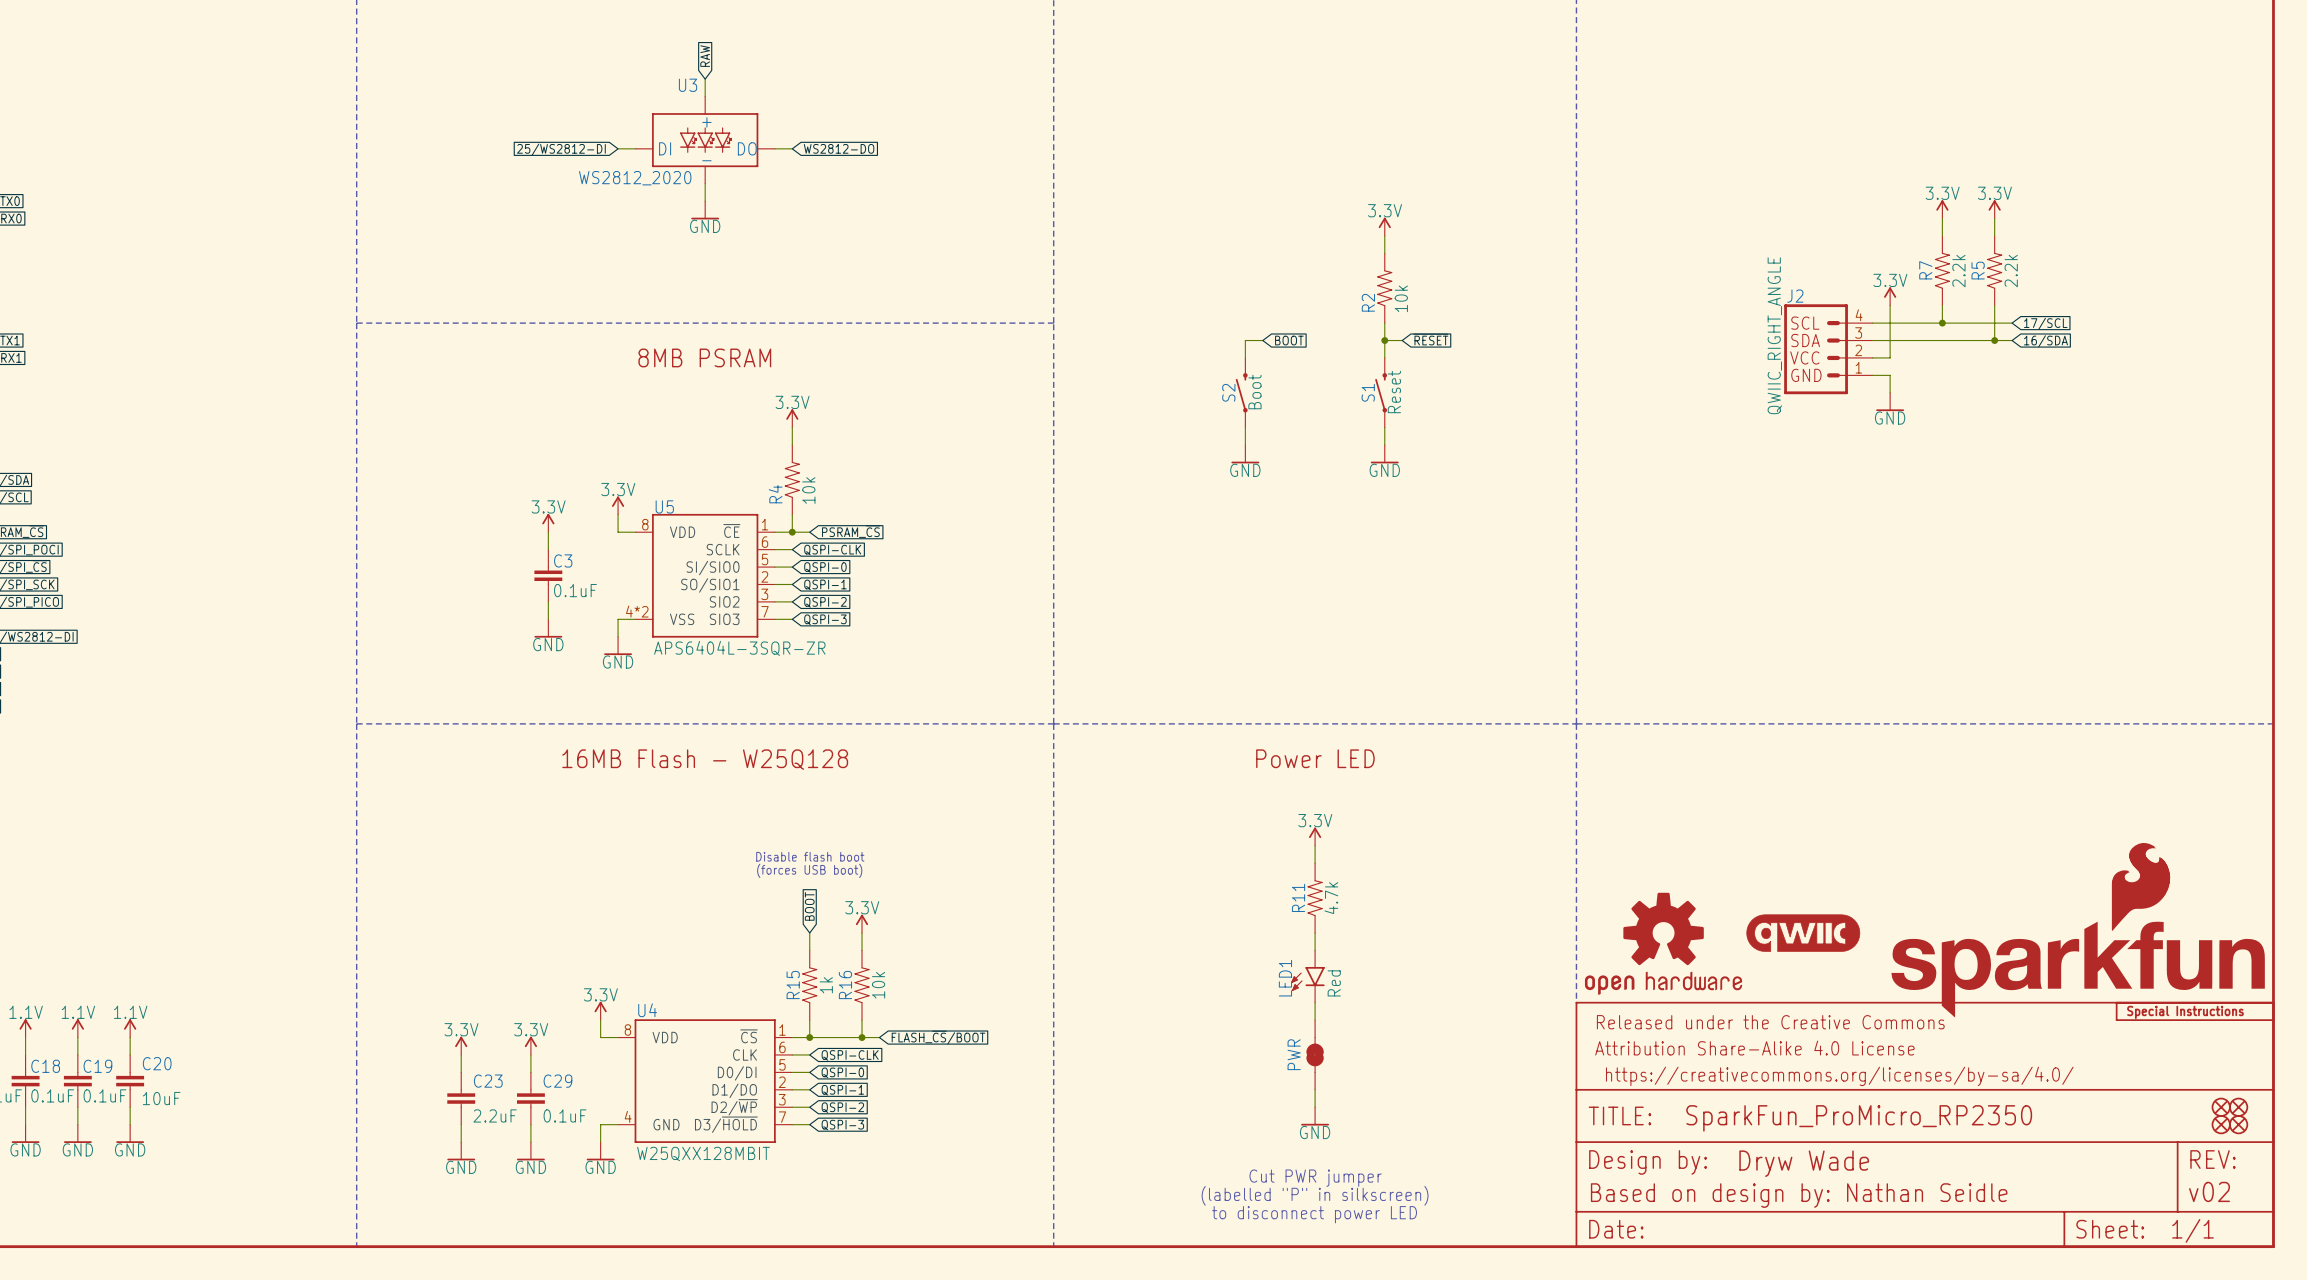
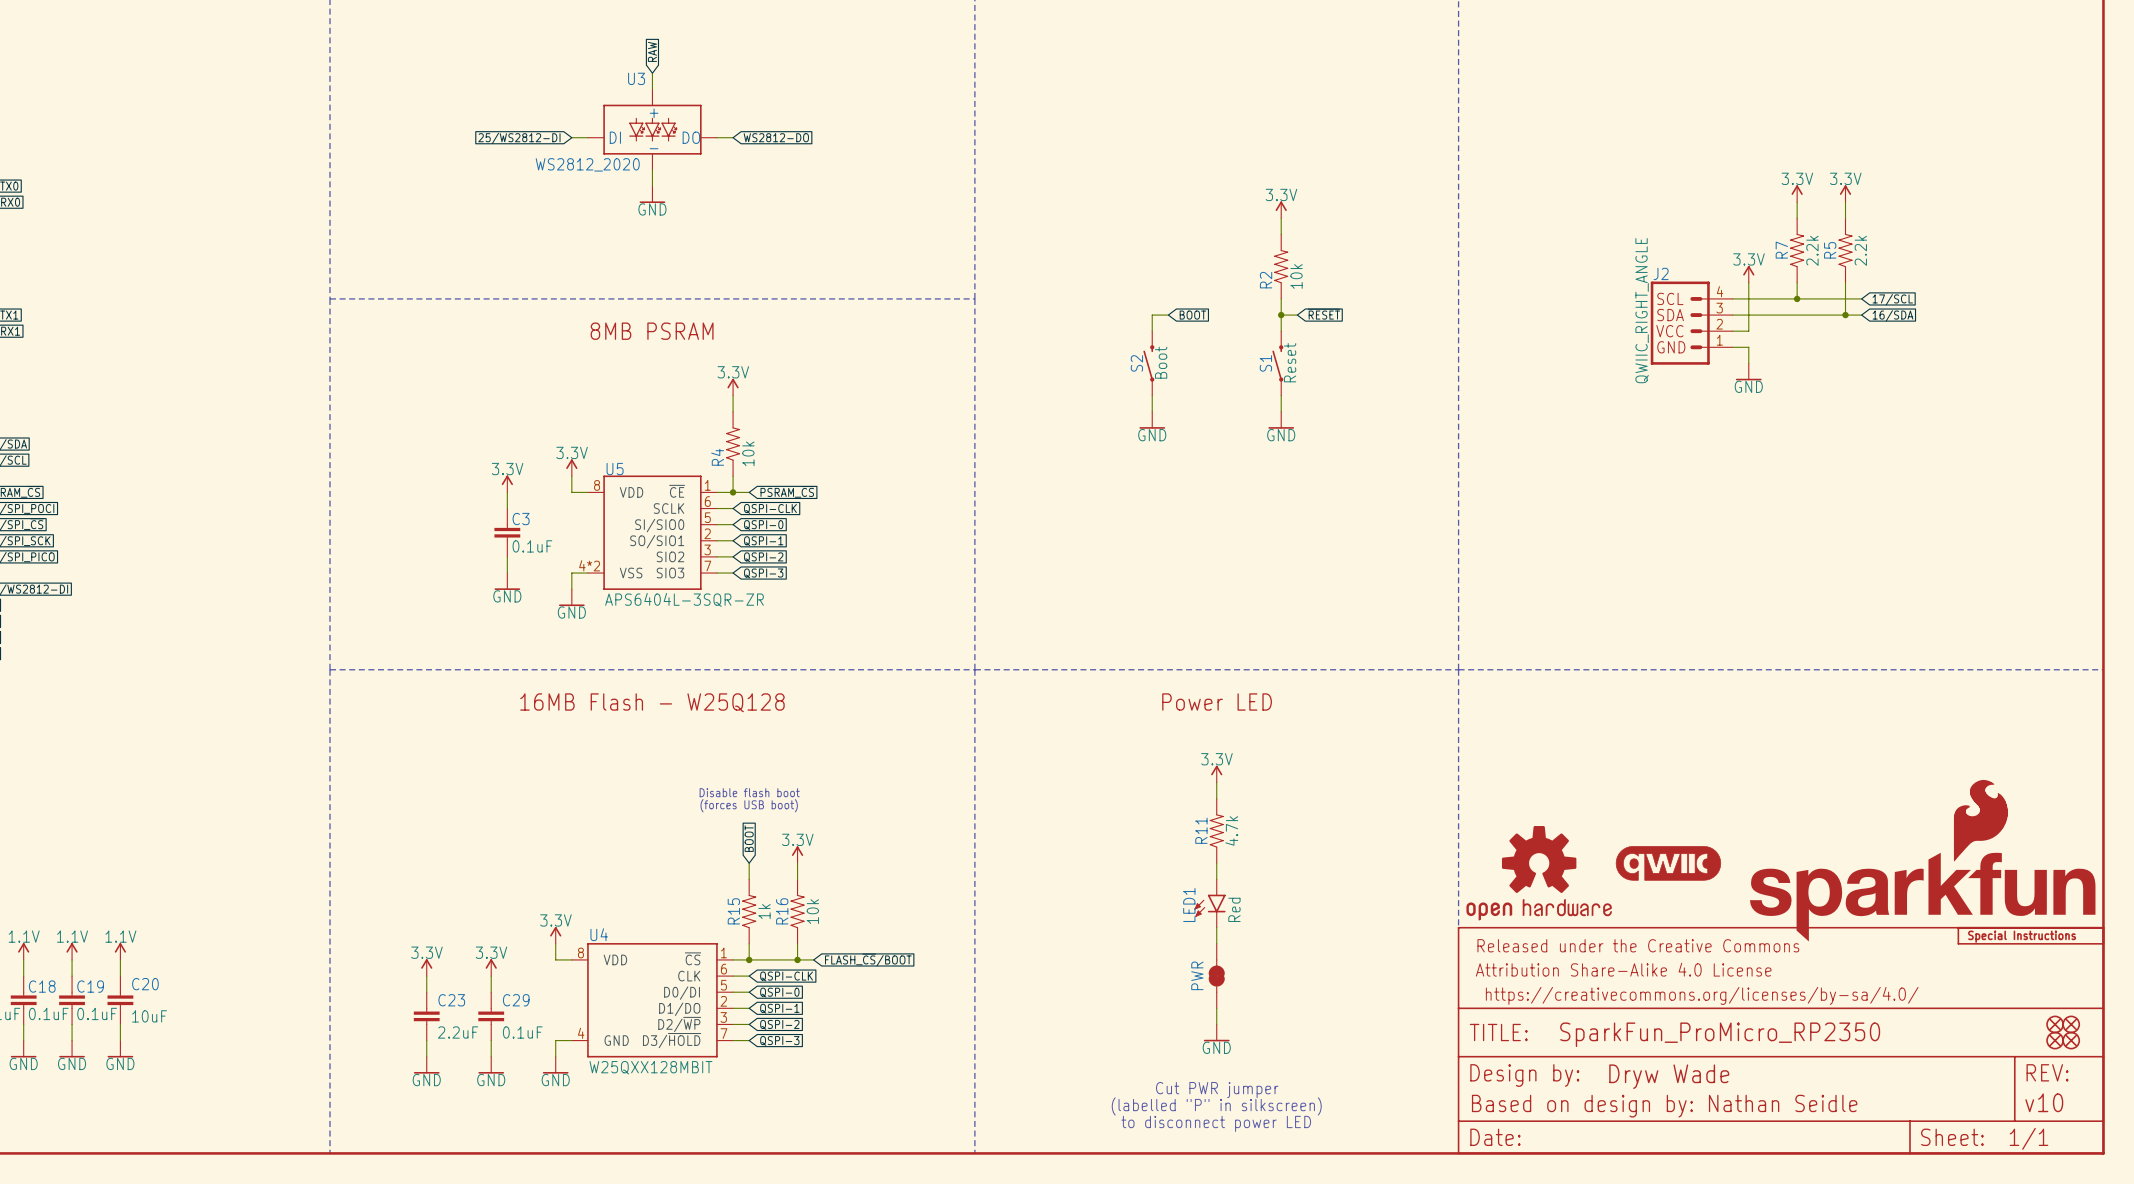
part text: v02 (2209, 1191) -> v10 (2044, 1102)

